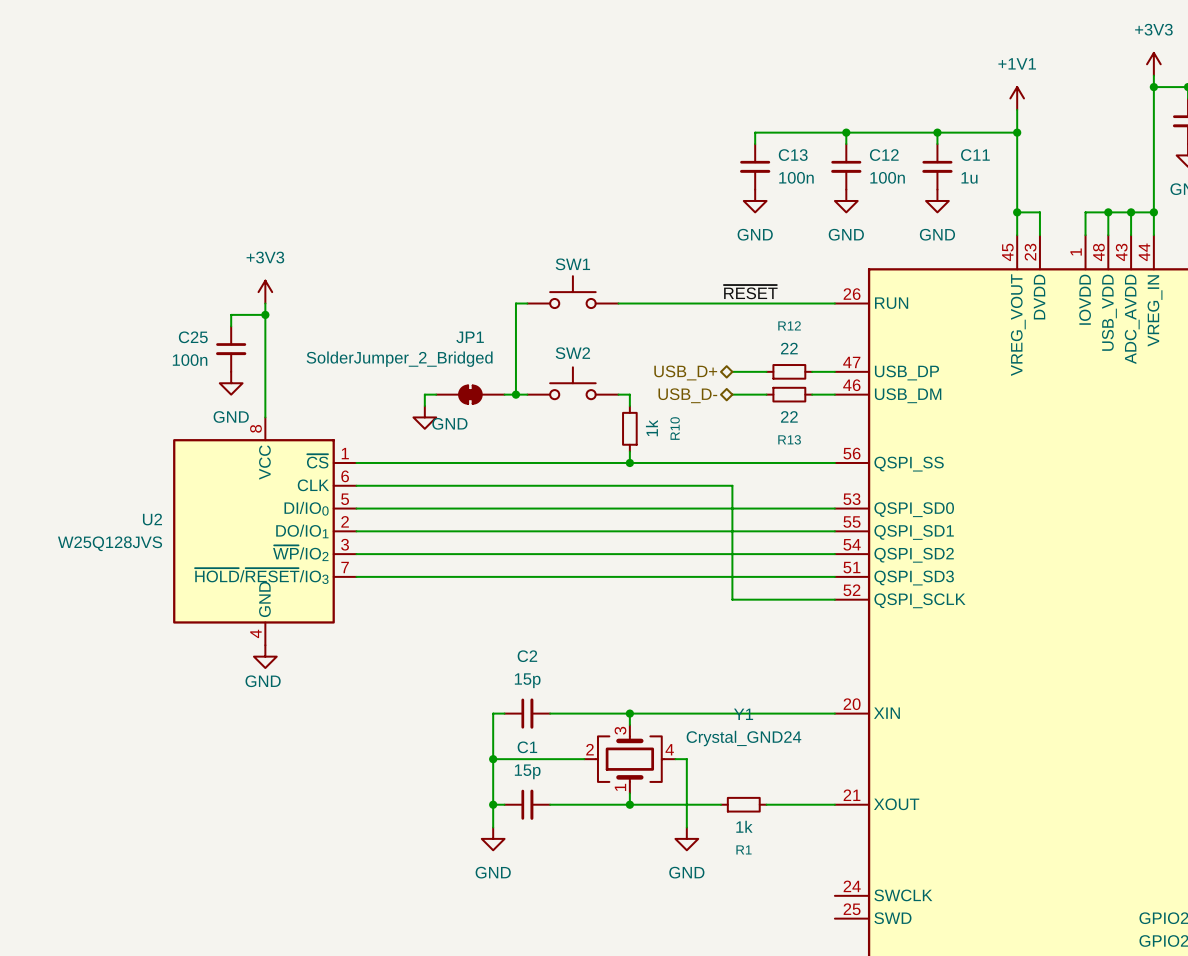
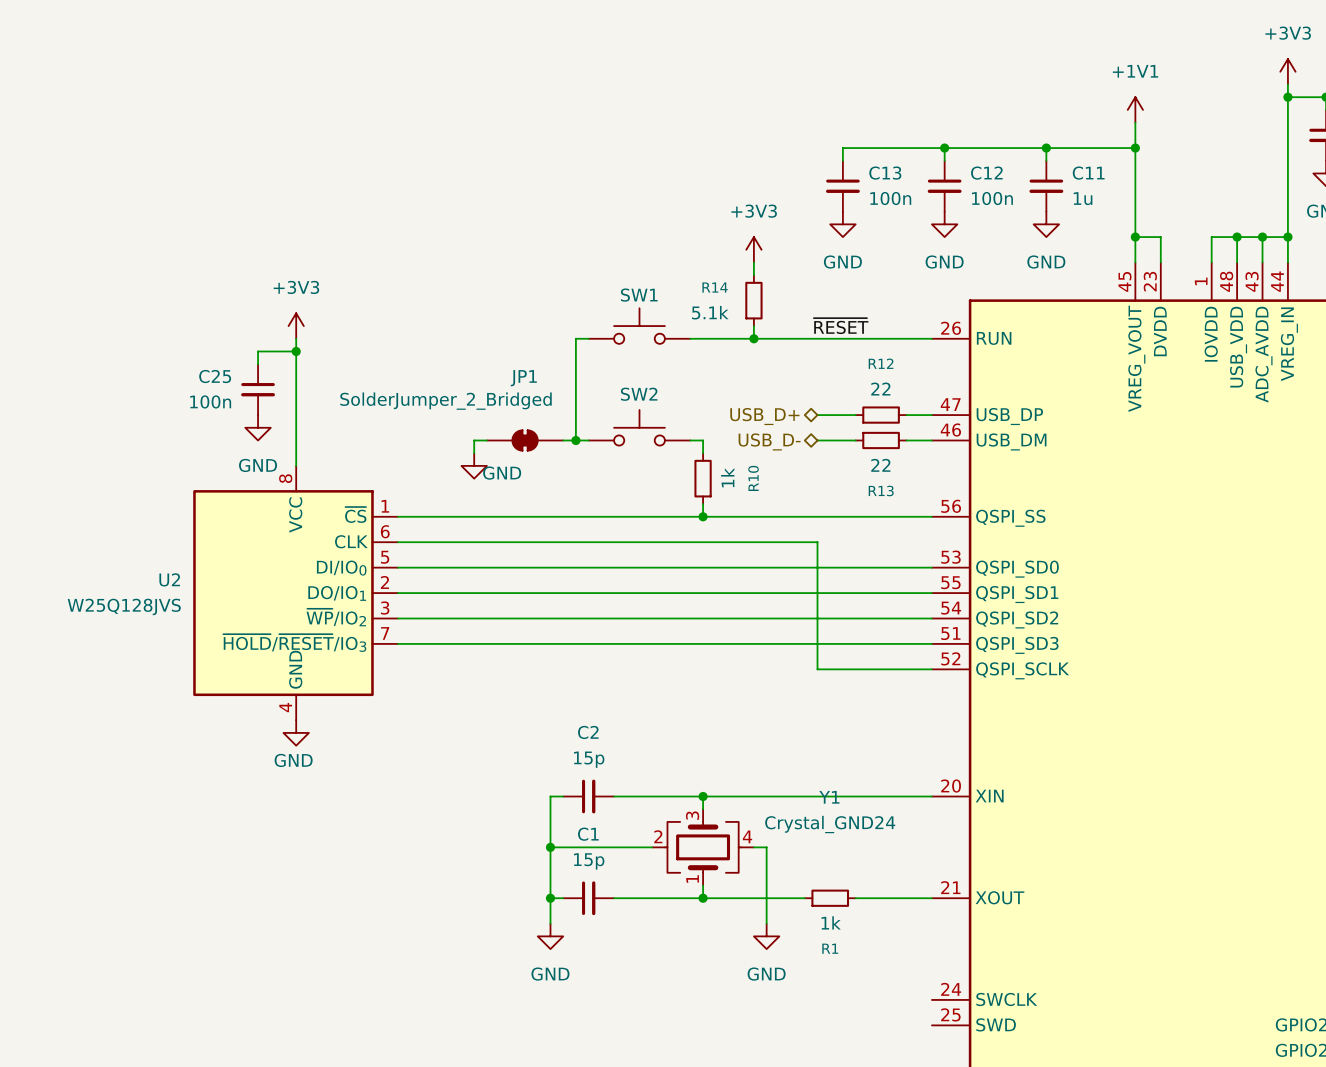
power symbol: none -> +3V3 (753, 249)
wire: none -> (753, 262) (753, 275)
R14: none -> 5.1k (753, 300)
wire: none -> (753, 326) (753, 338)
junction: none -> (753, 338)

